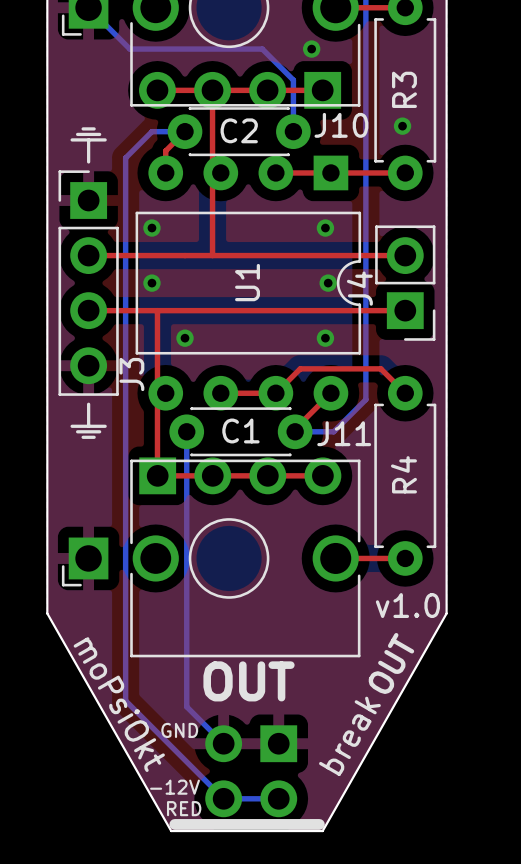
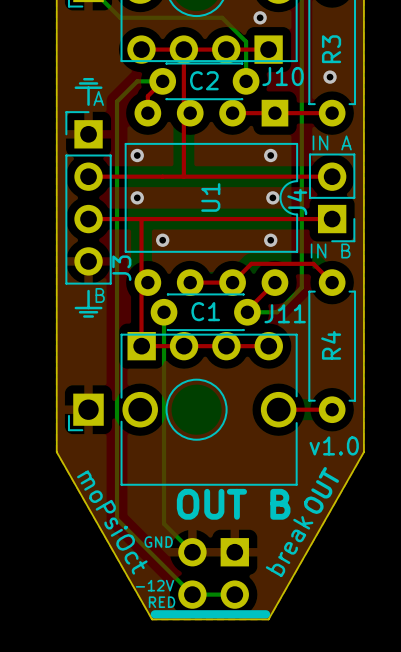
text: none -> A (98, 98)
text: none -> IN A (332, 142)
text: none -> IN B (330, 250)
text: none -> B (100, 295)
text: none -> B (280, 504)
text: moPsiOkt (119, 704) -> moPsiOct (112, 522)

